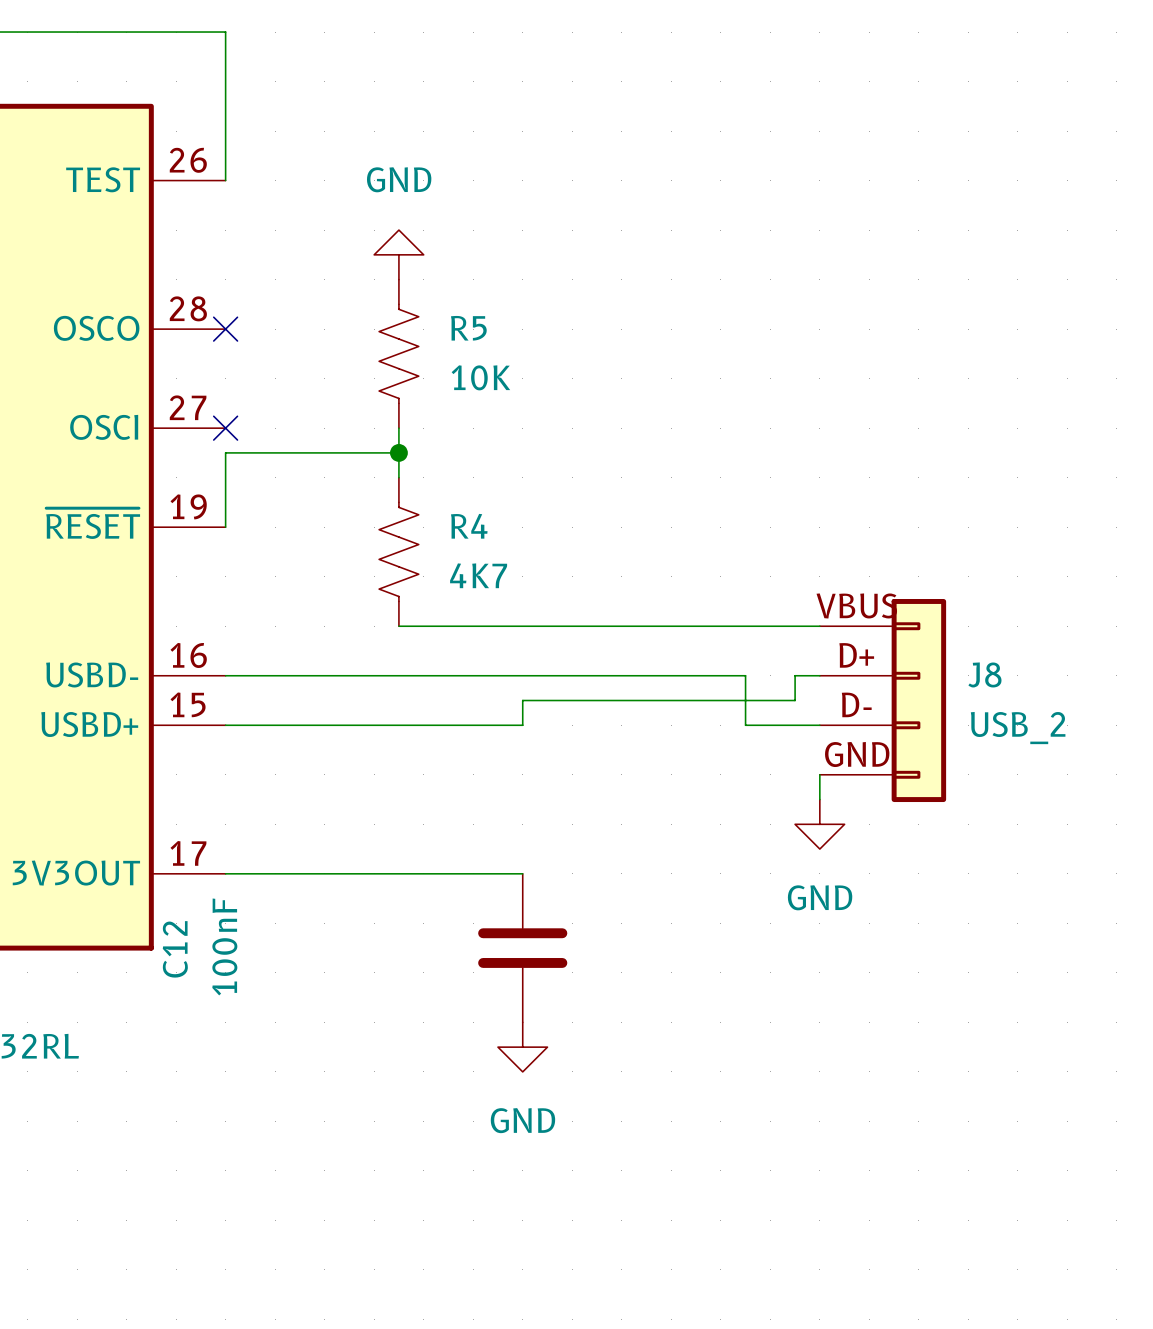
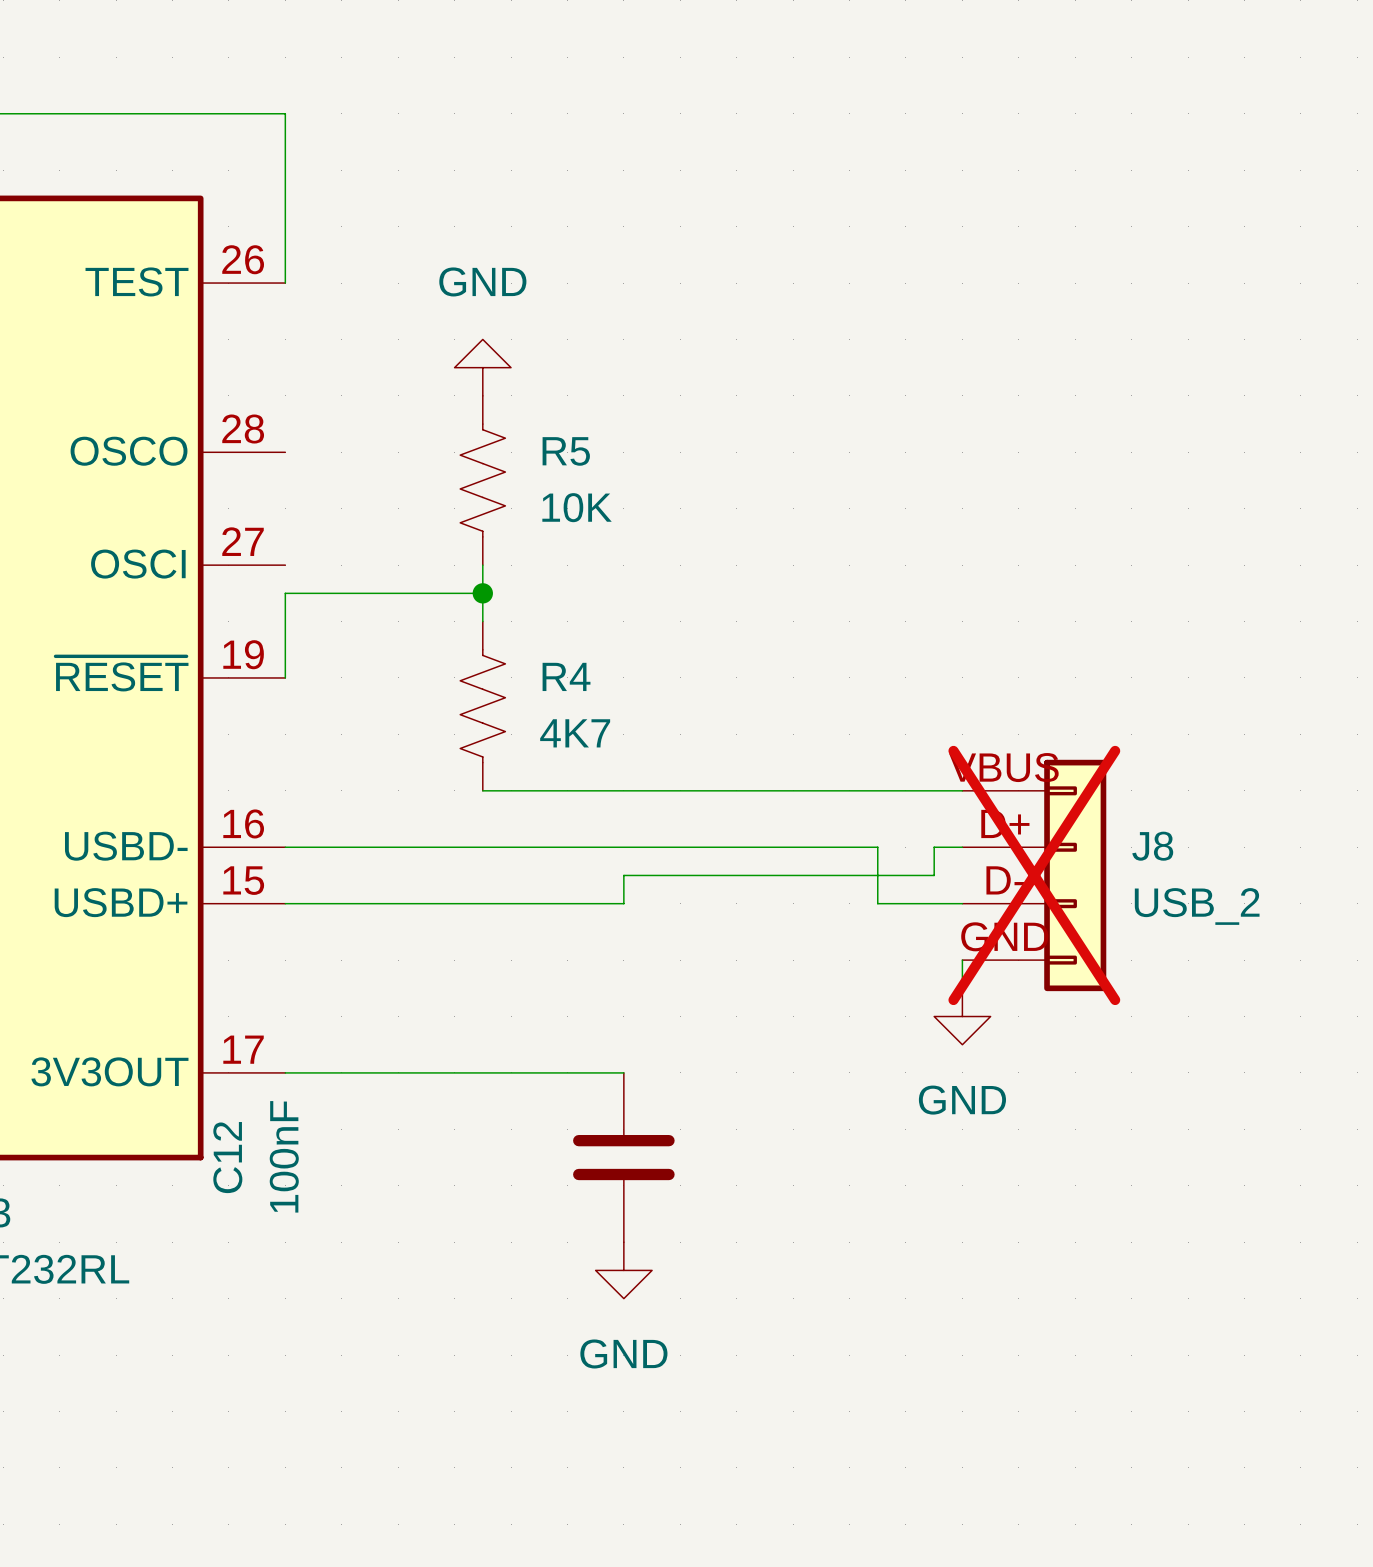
no-connect mark: (225, 329) -> none
no-connect mark: (225, 428) -> none
J8 do-not-place cross: none -> (1034, 875)

